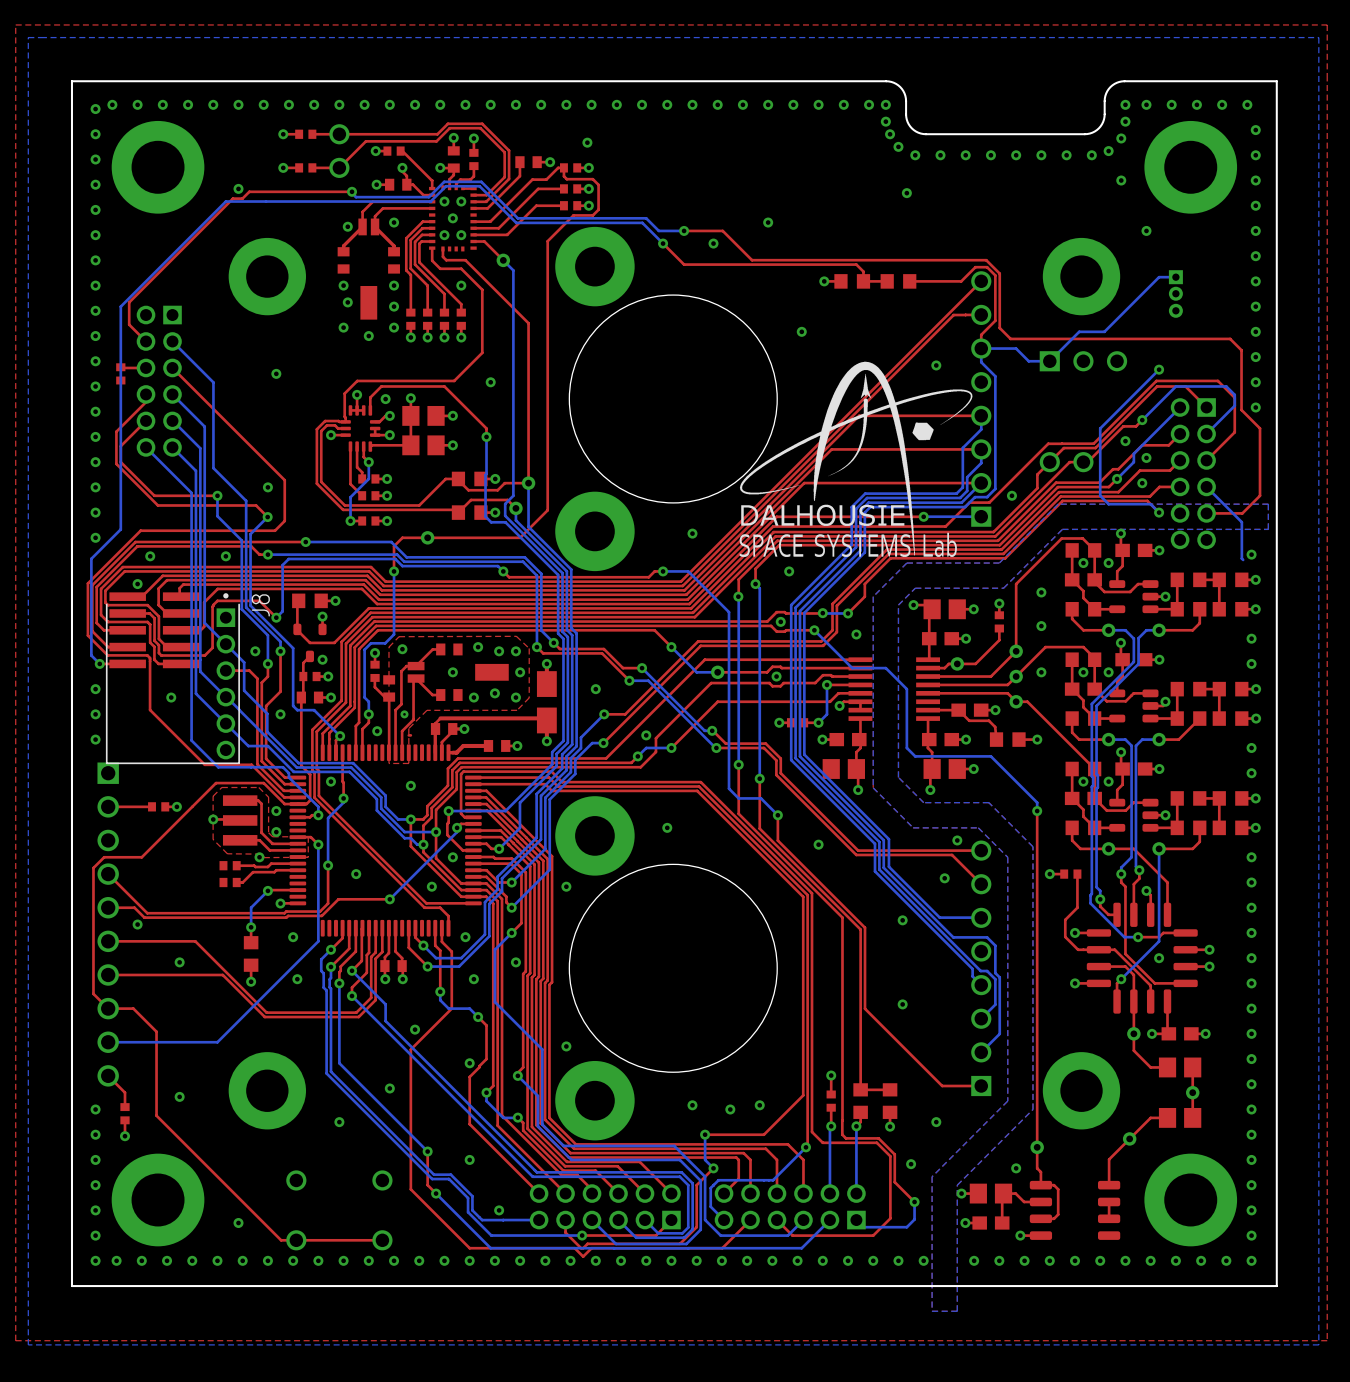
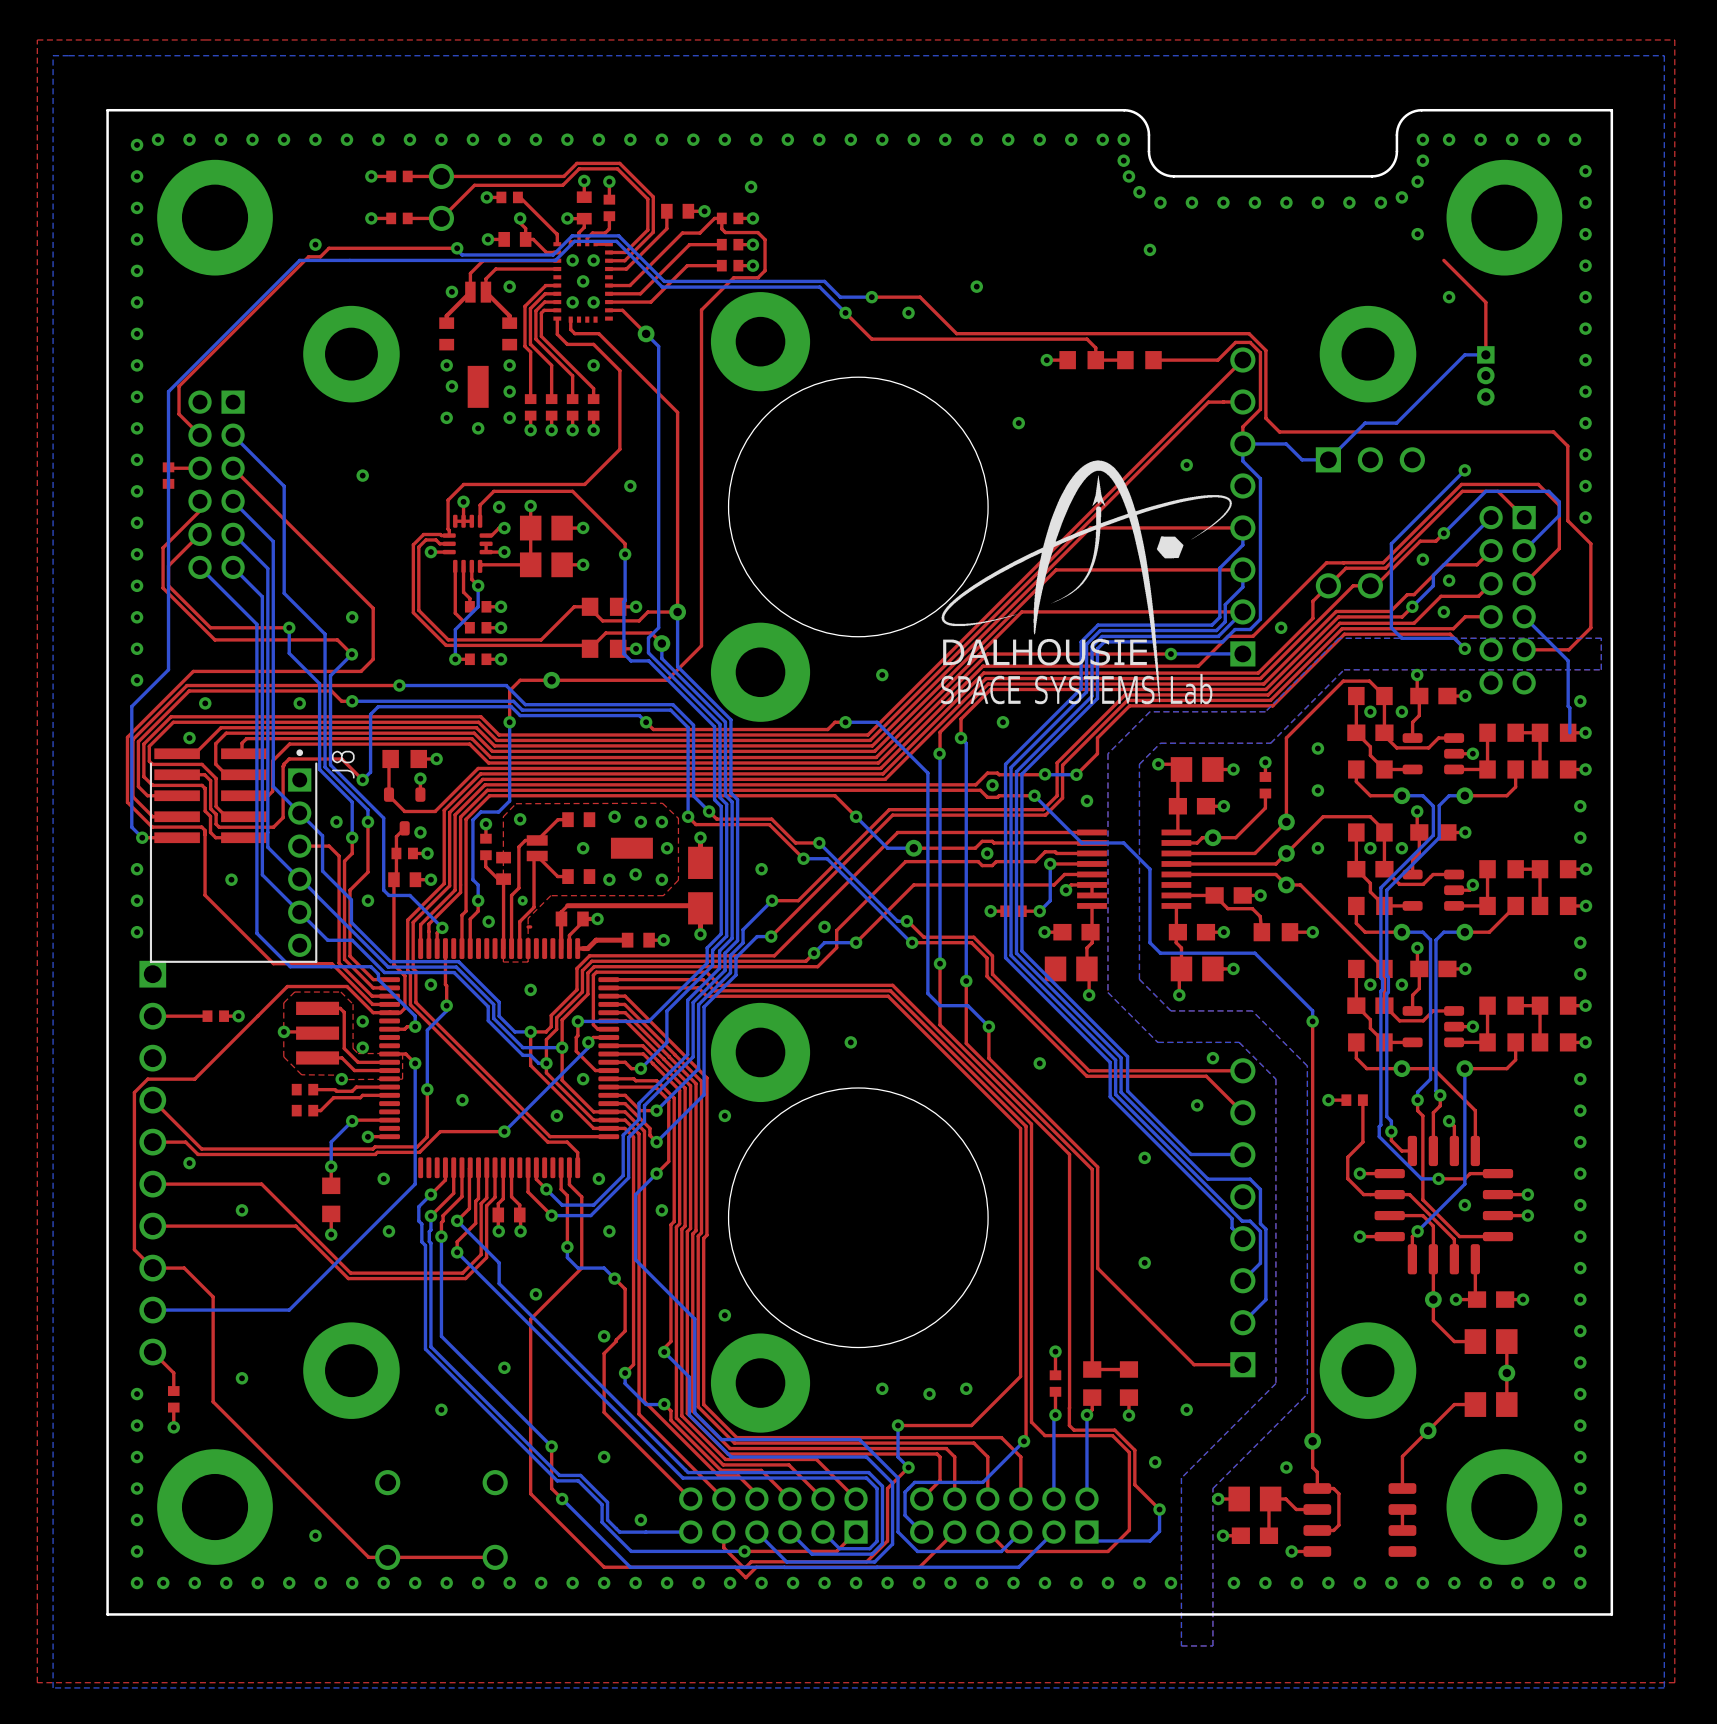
top track: none -> (1443, 260) (1485, 302) (1485, 354)
bottom track: none -> (1569, 707) (1569, 732)

